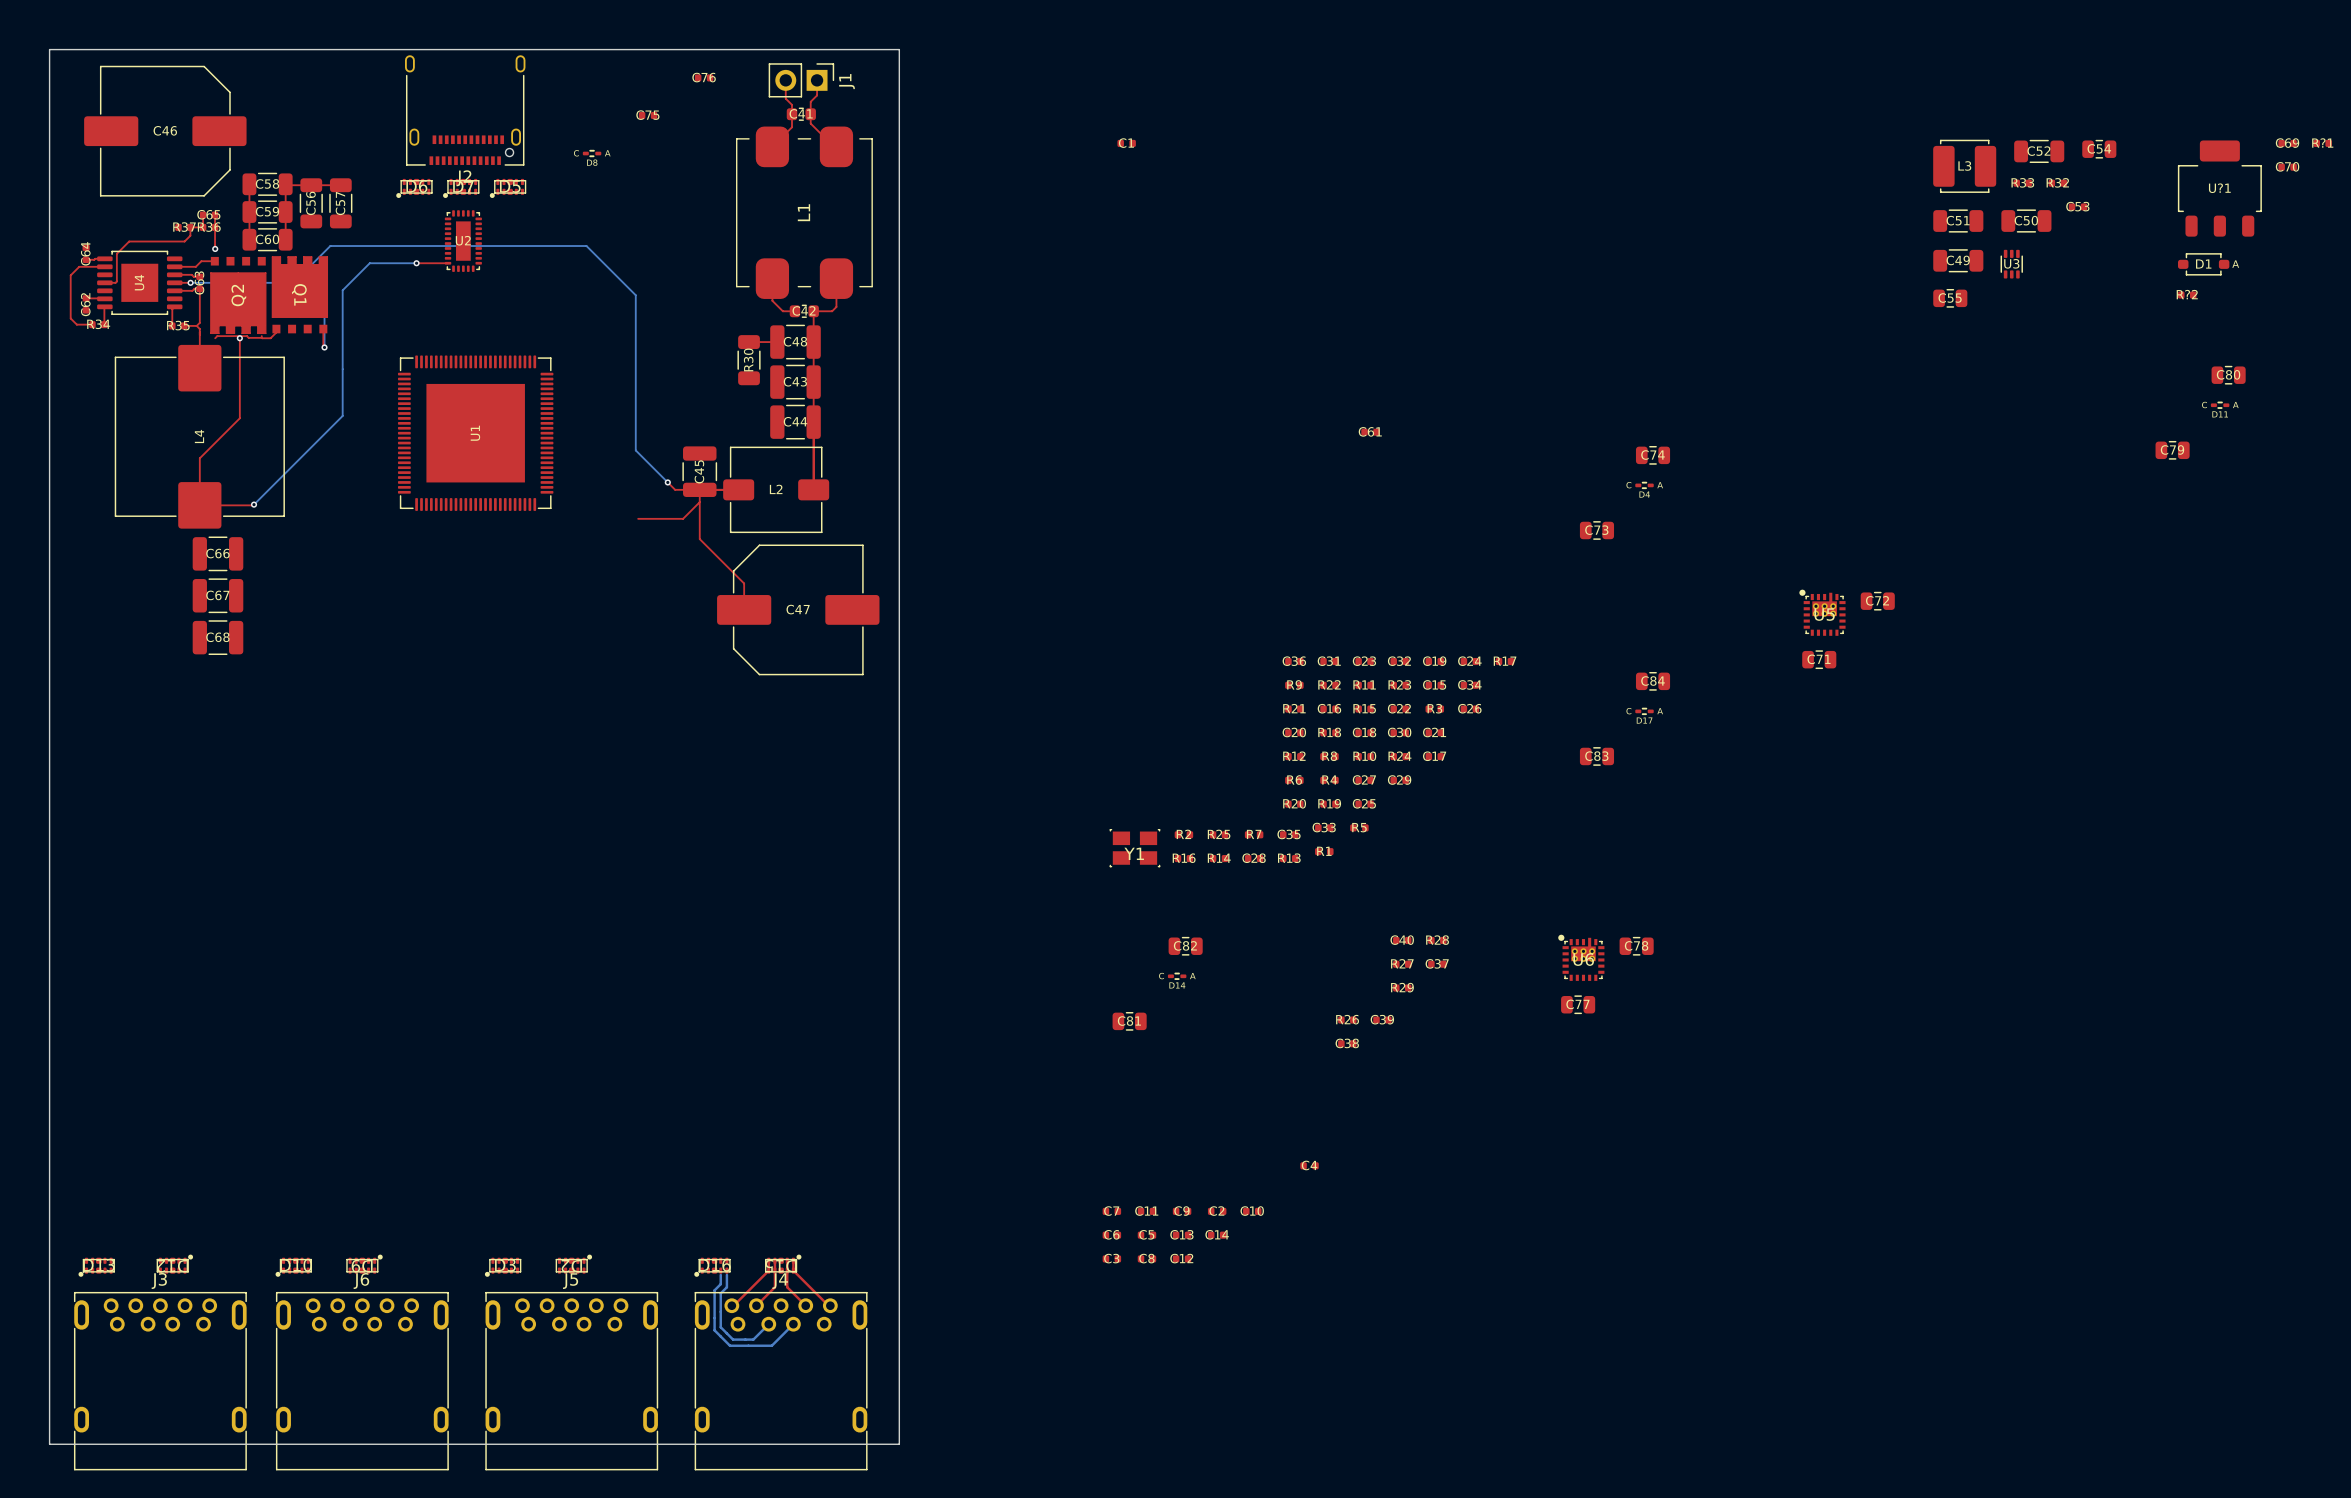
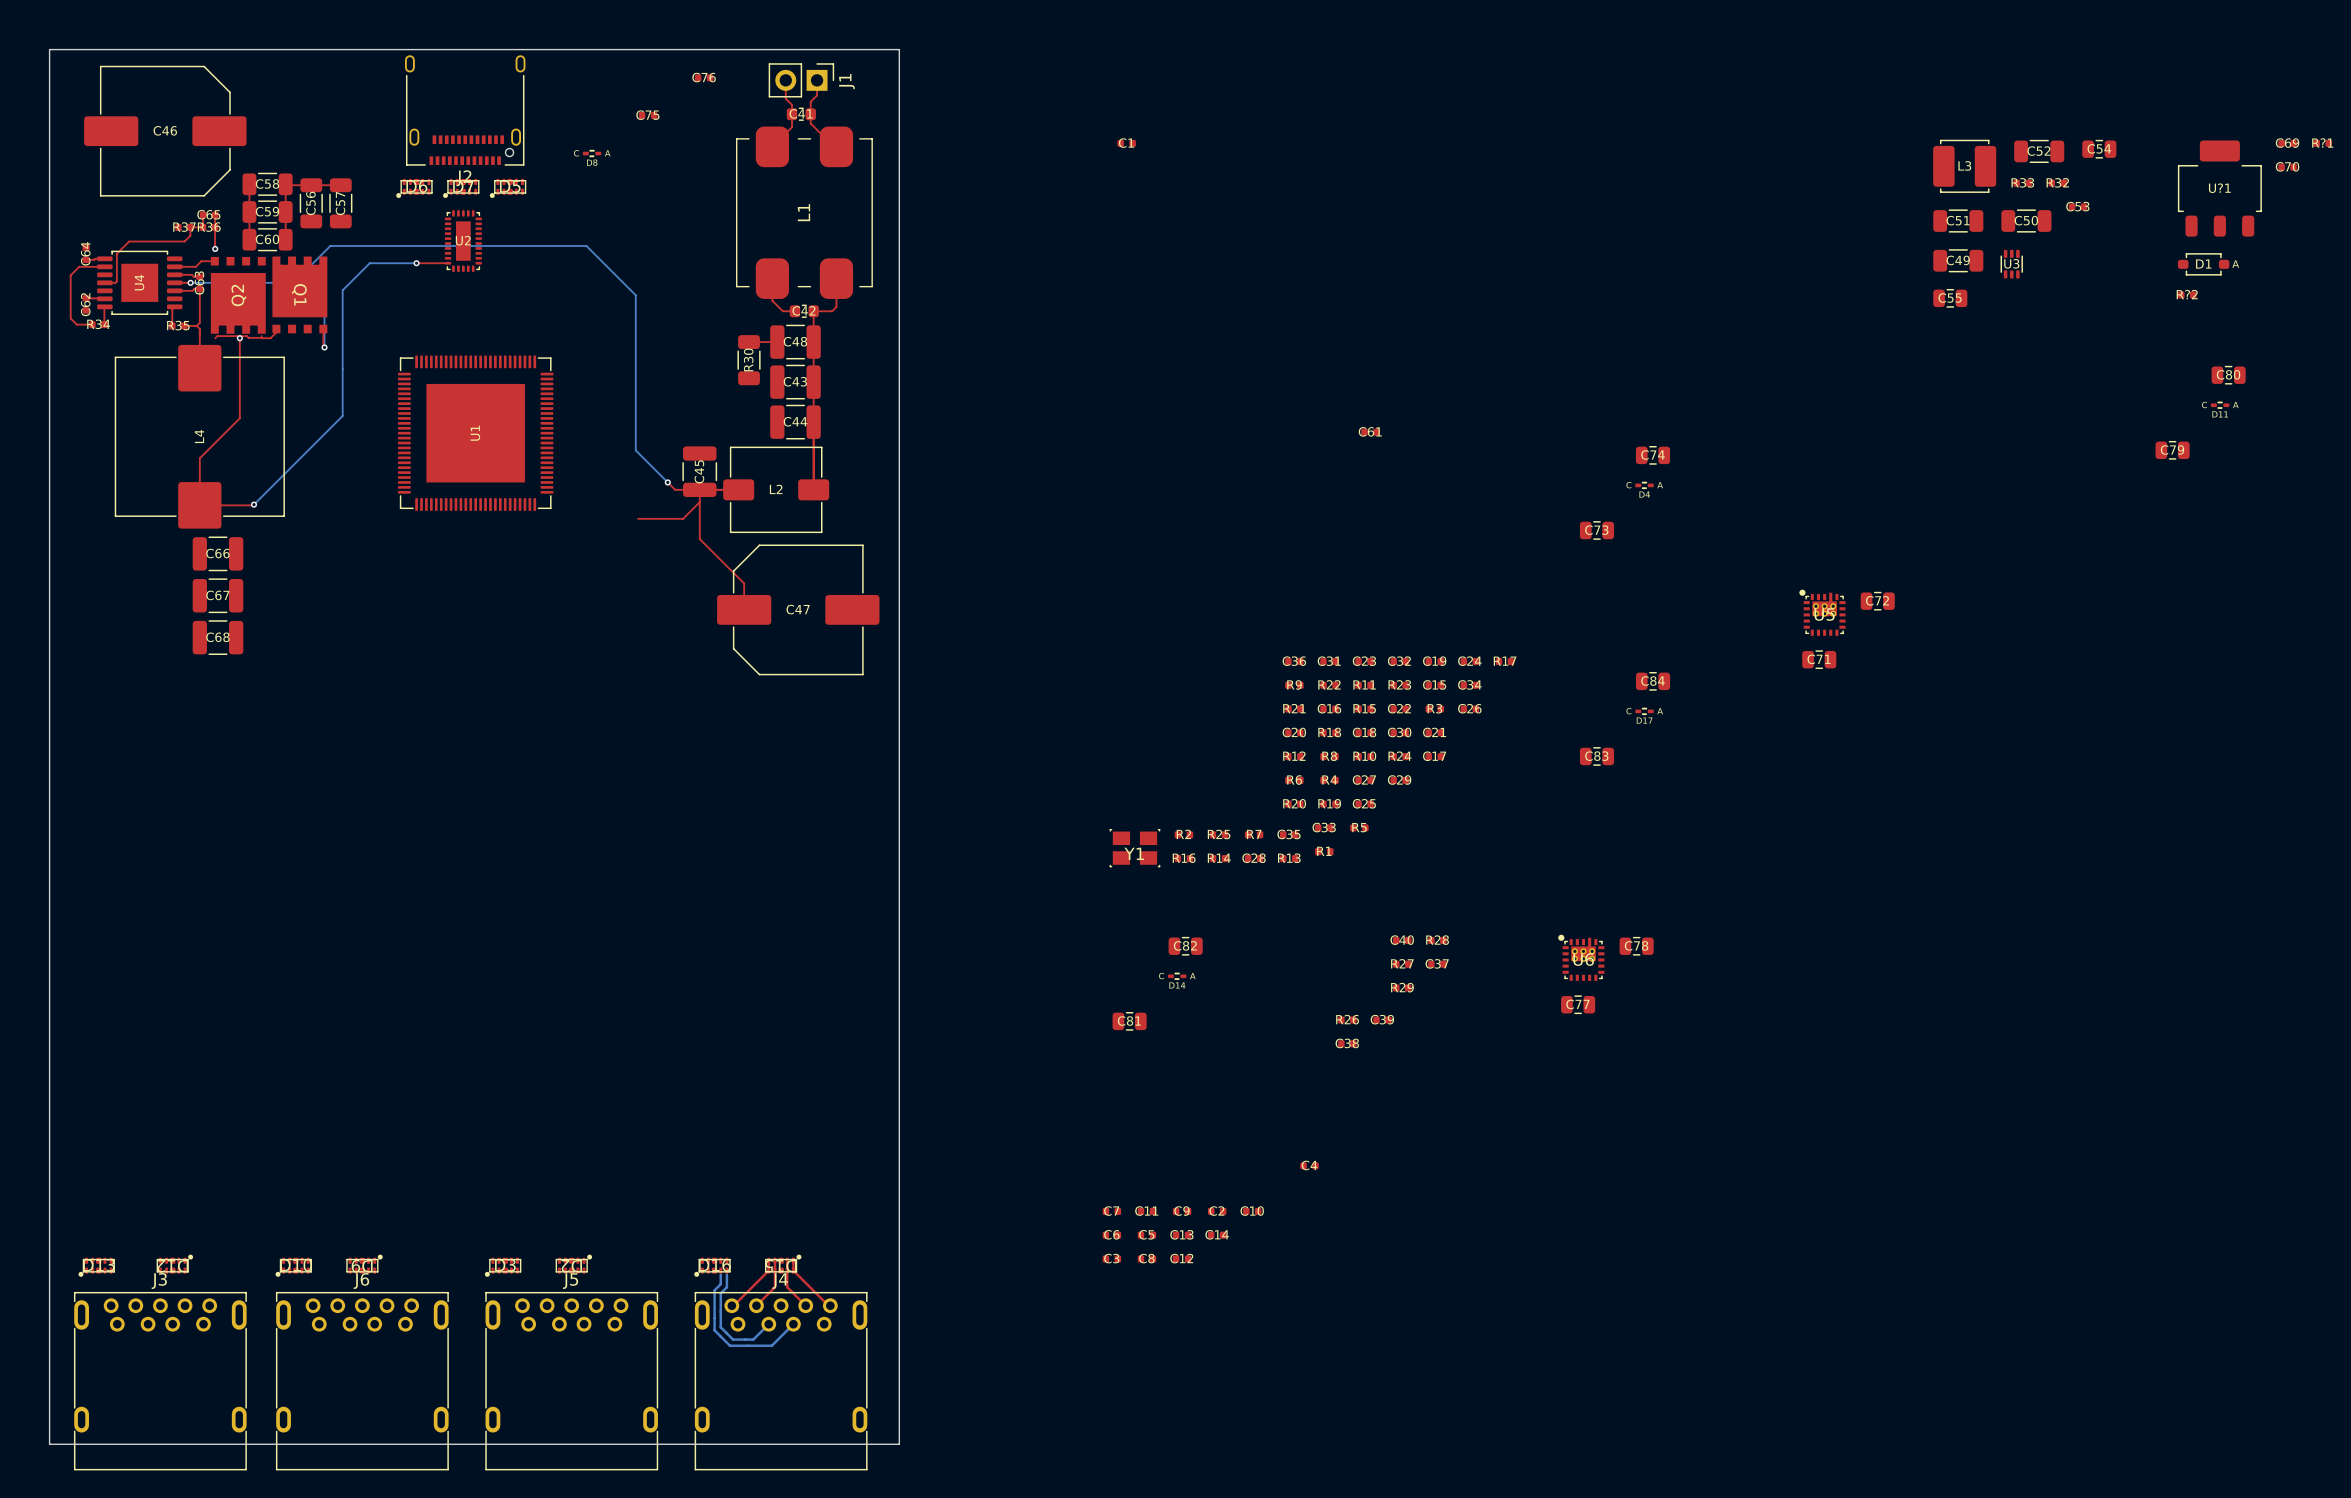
Q2 footprint: [210, 256, 266, 334] -> [210, 256, 266, 334]
Q1 footprint: [272, 256, 328, 334] -> [272, 256, 328, 334]

